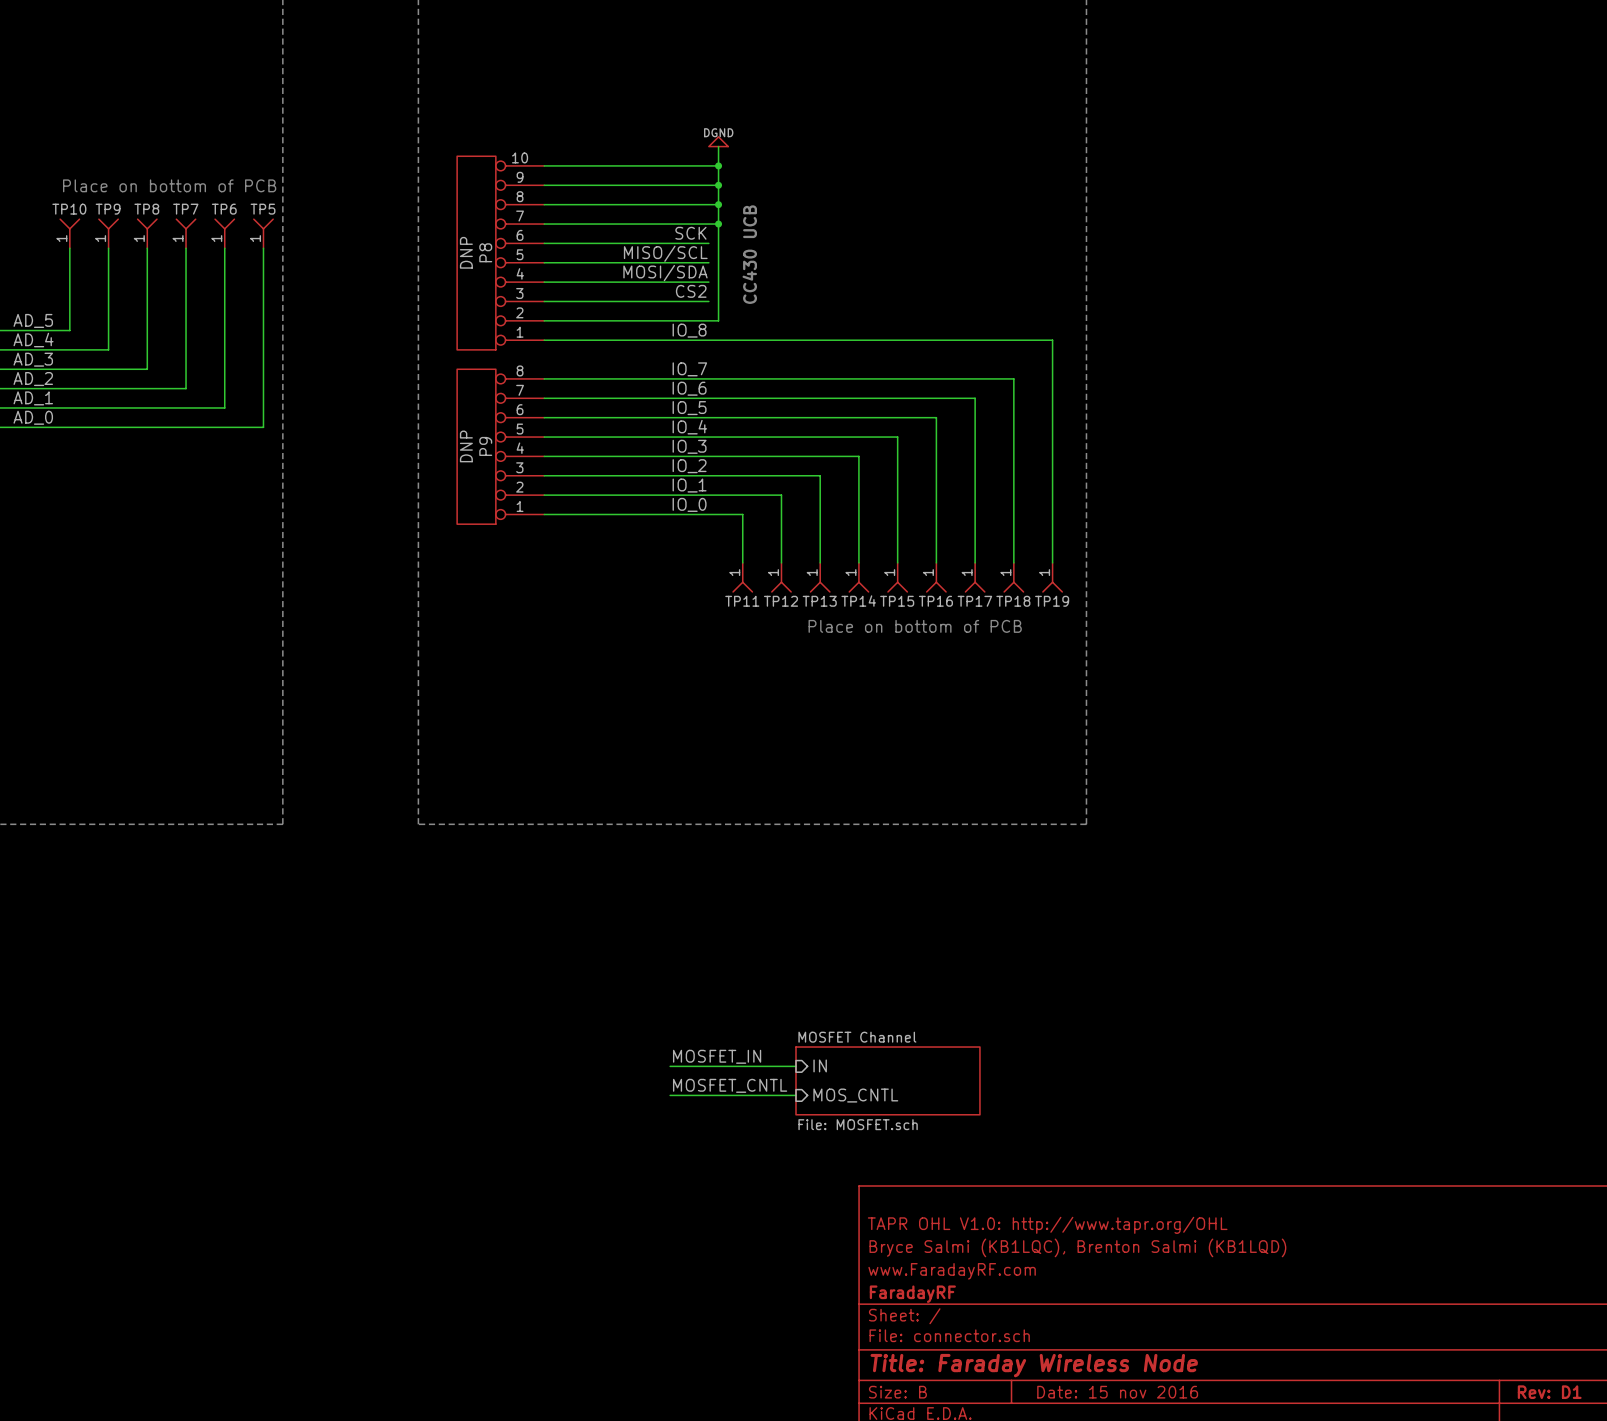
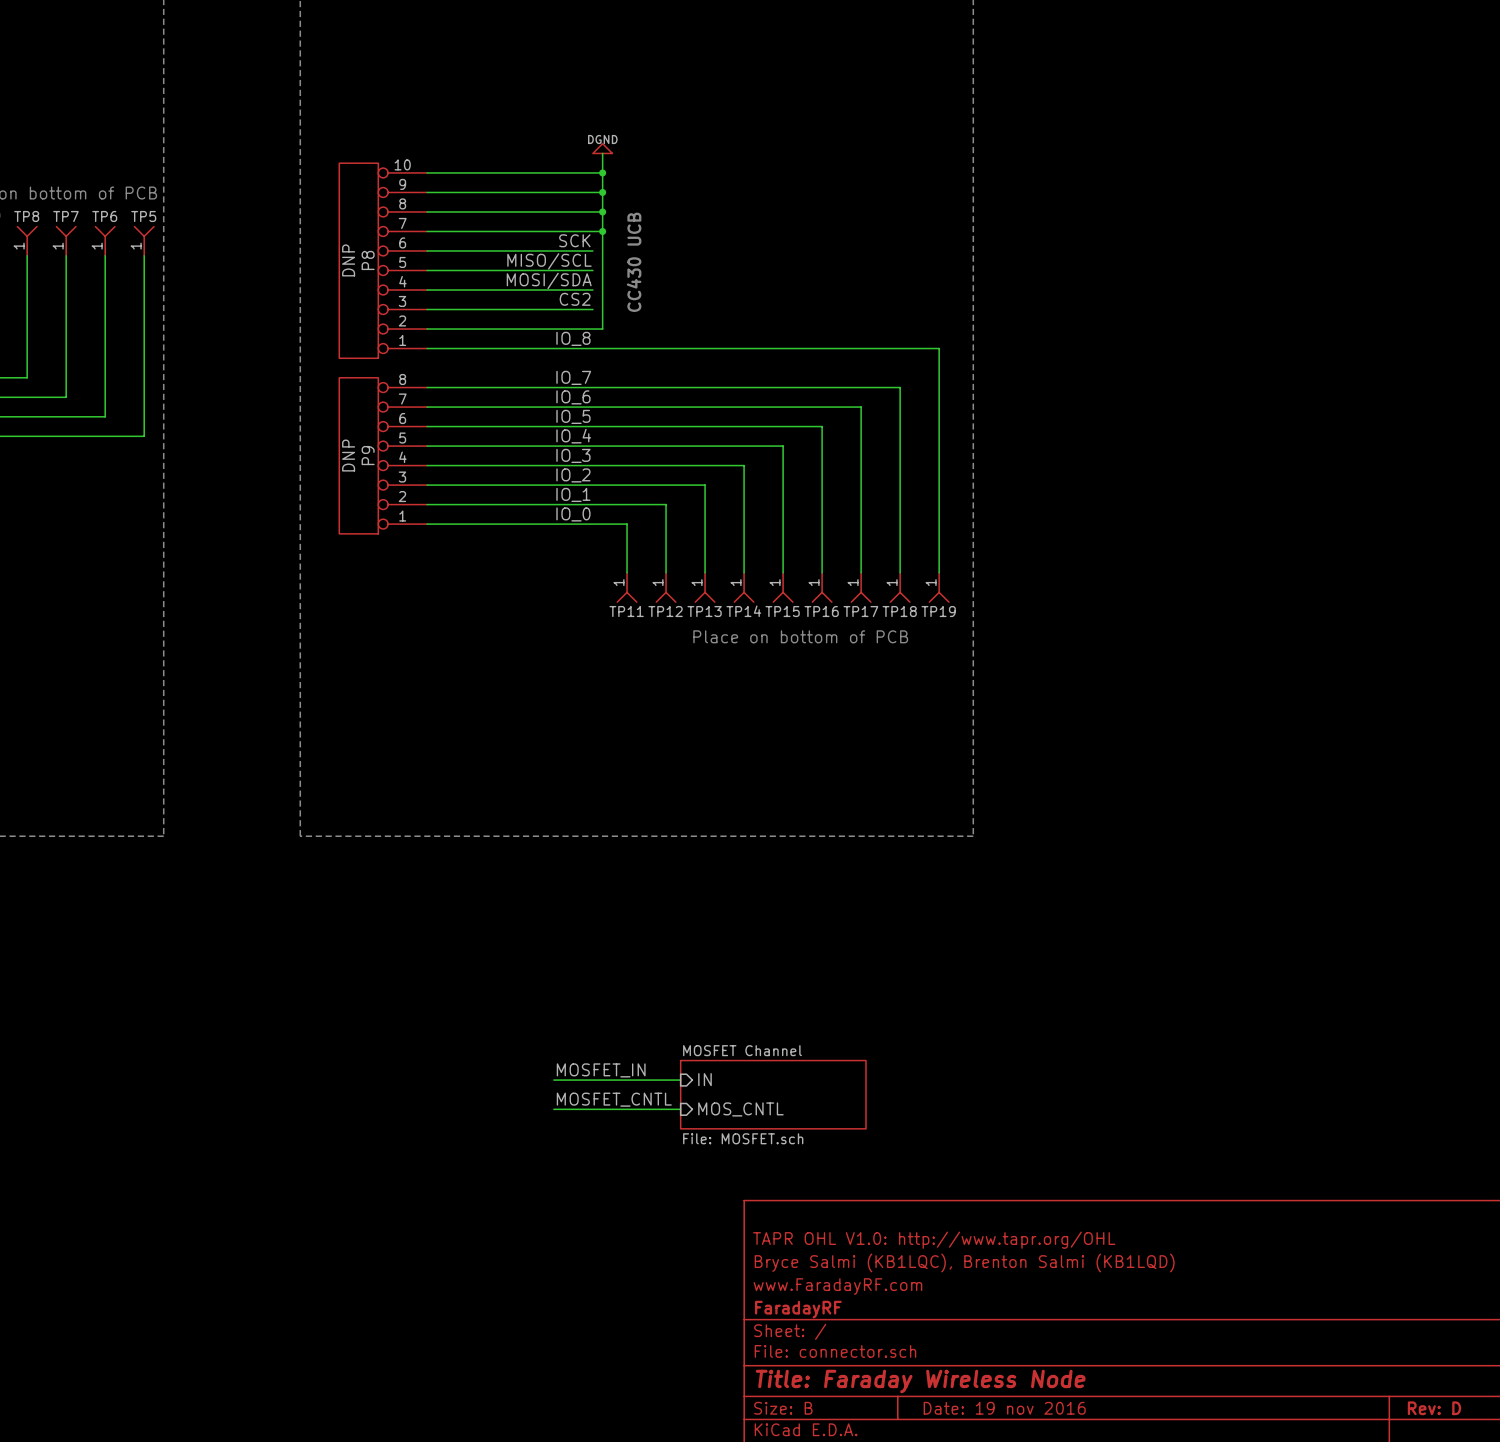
title block: Date: 15 nov 2016 (1117, 1392) -> Date: 19 nov 2016 (1004, 1408)
title block: Rev: D1 (1549, 1392) -> Rev: D (1434, 1408)

